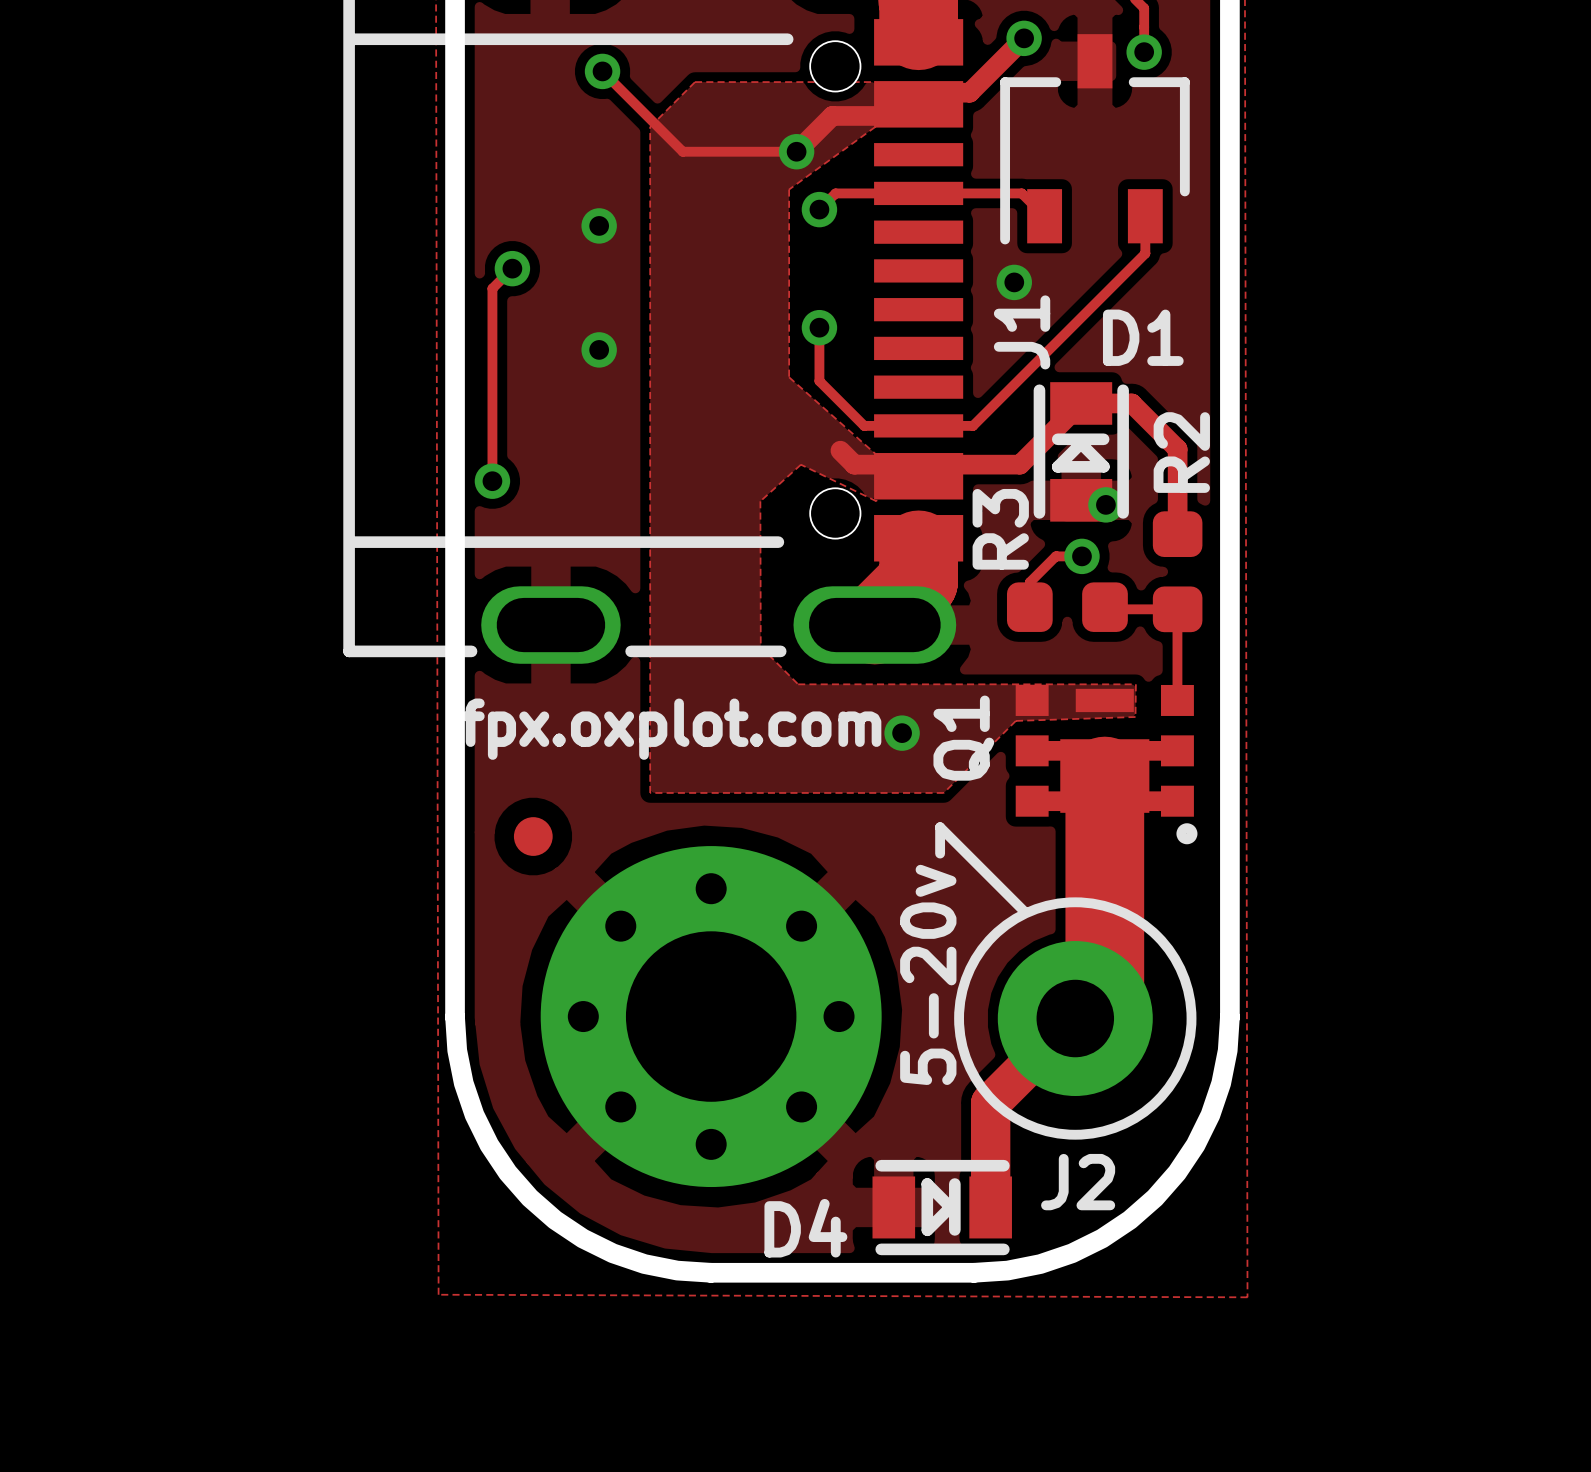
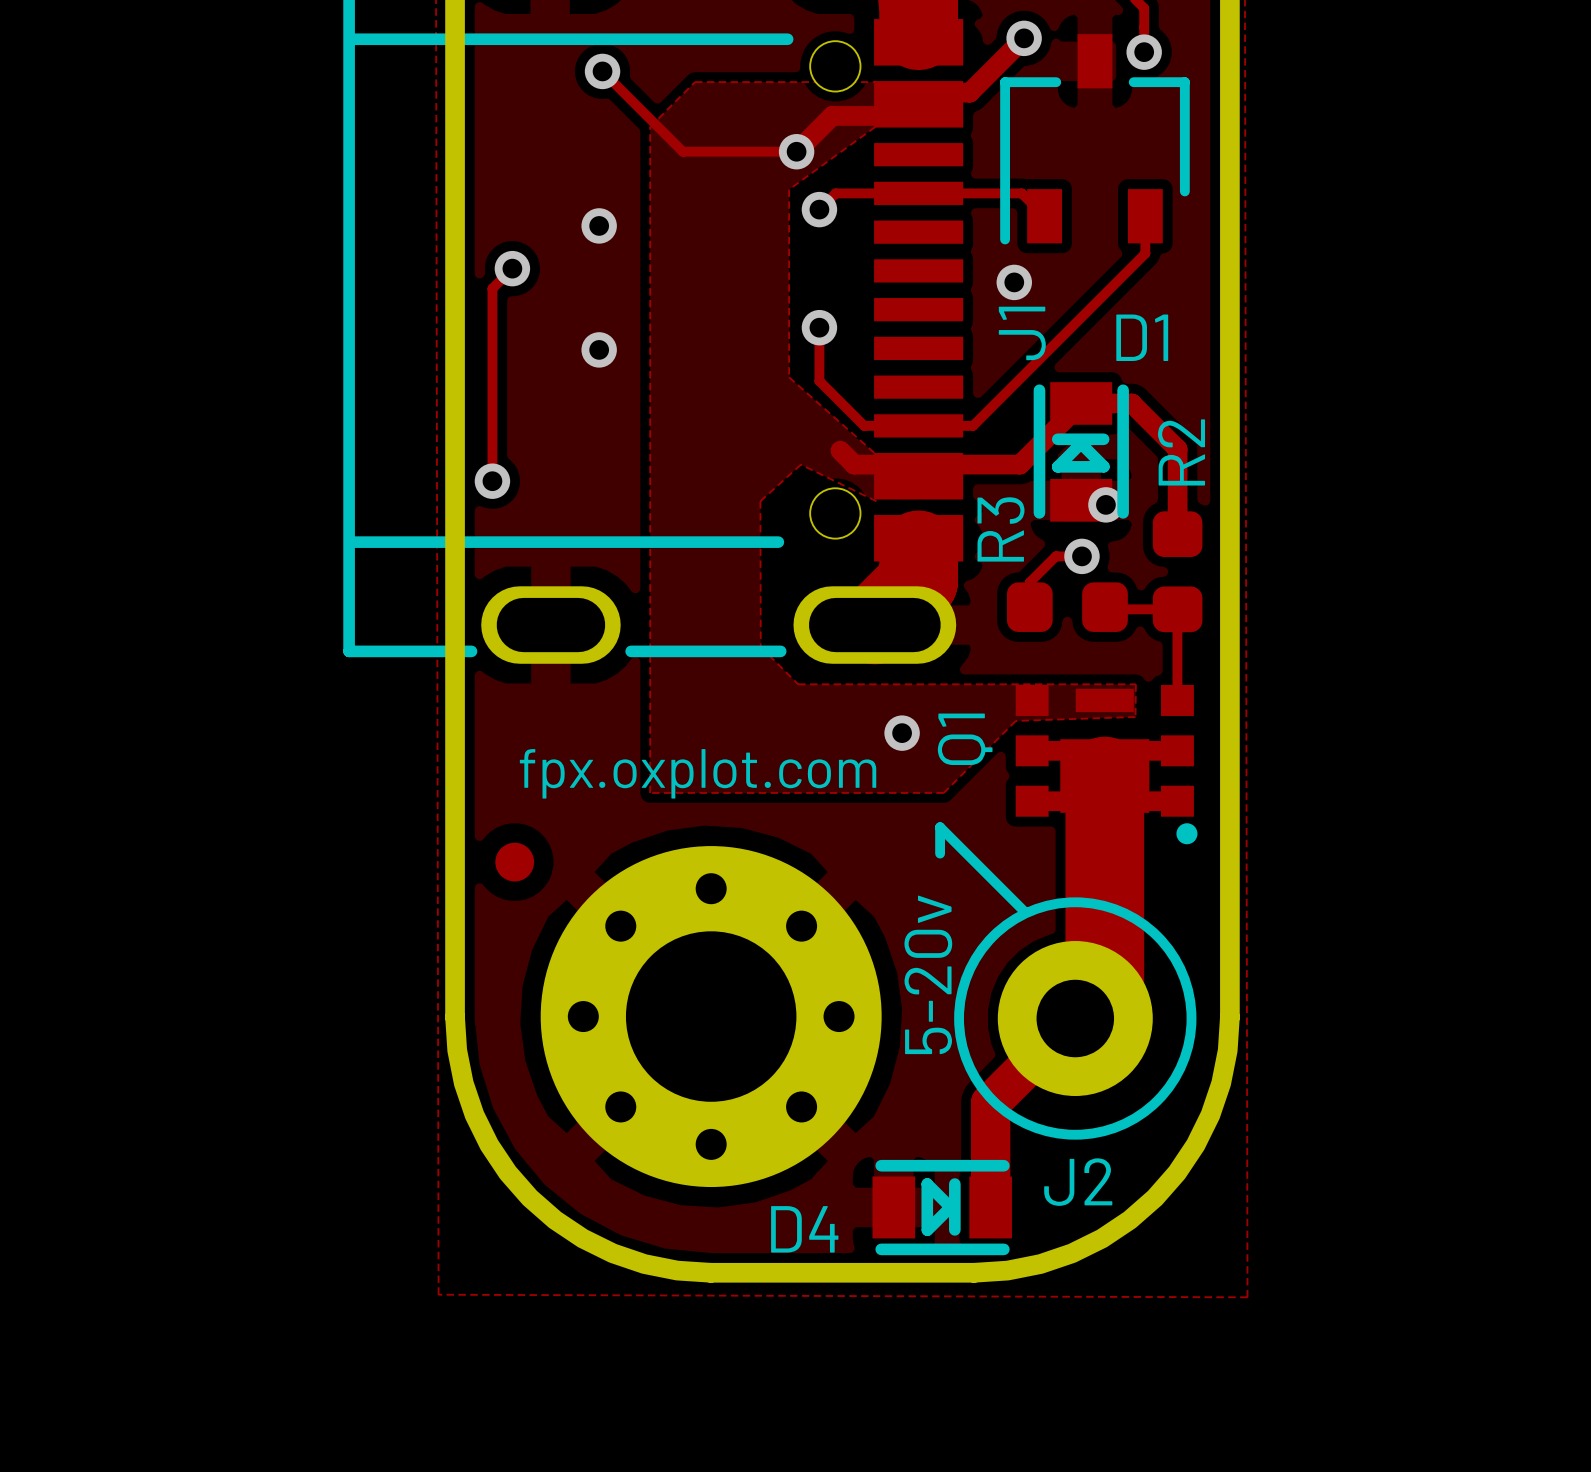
text position: fpx.oxplot.com (670, 729) -> fpx.oxplot.com (698, 773)
part position: (533, 836) -> (514, 862)

